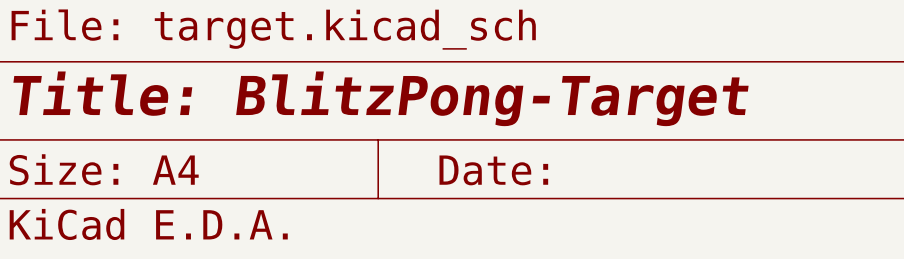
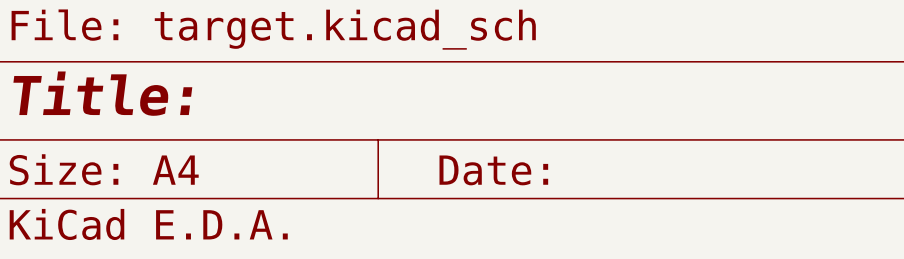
title block: Title: BlitzPong-Target (381, 98) -> Title: (102, 93)

